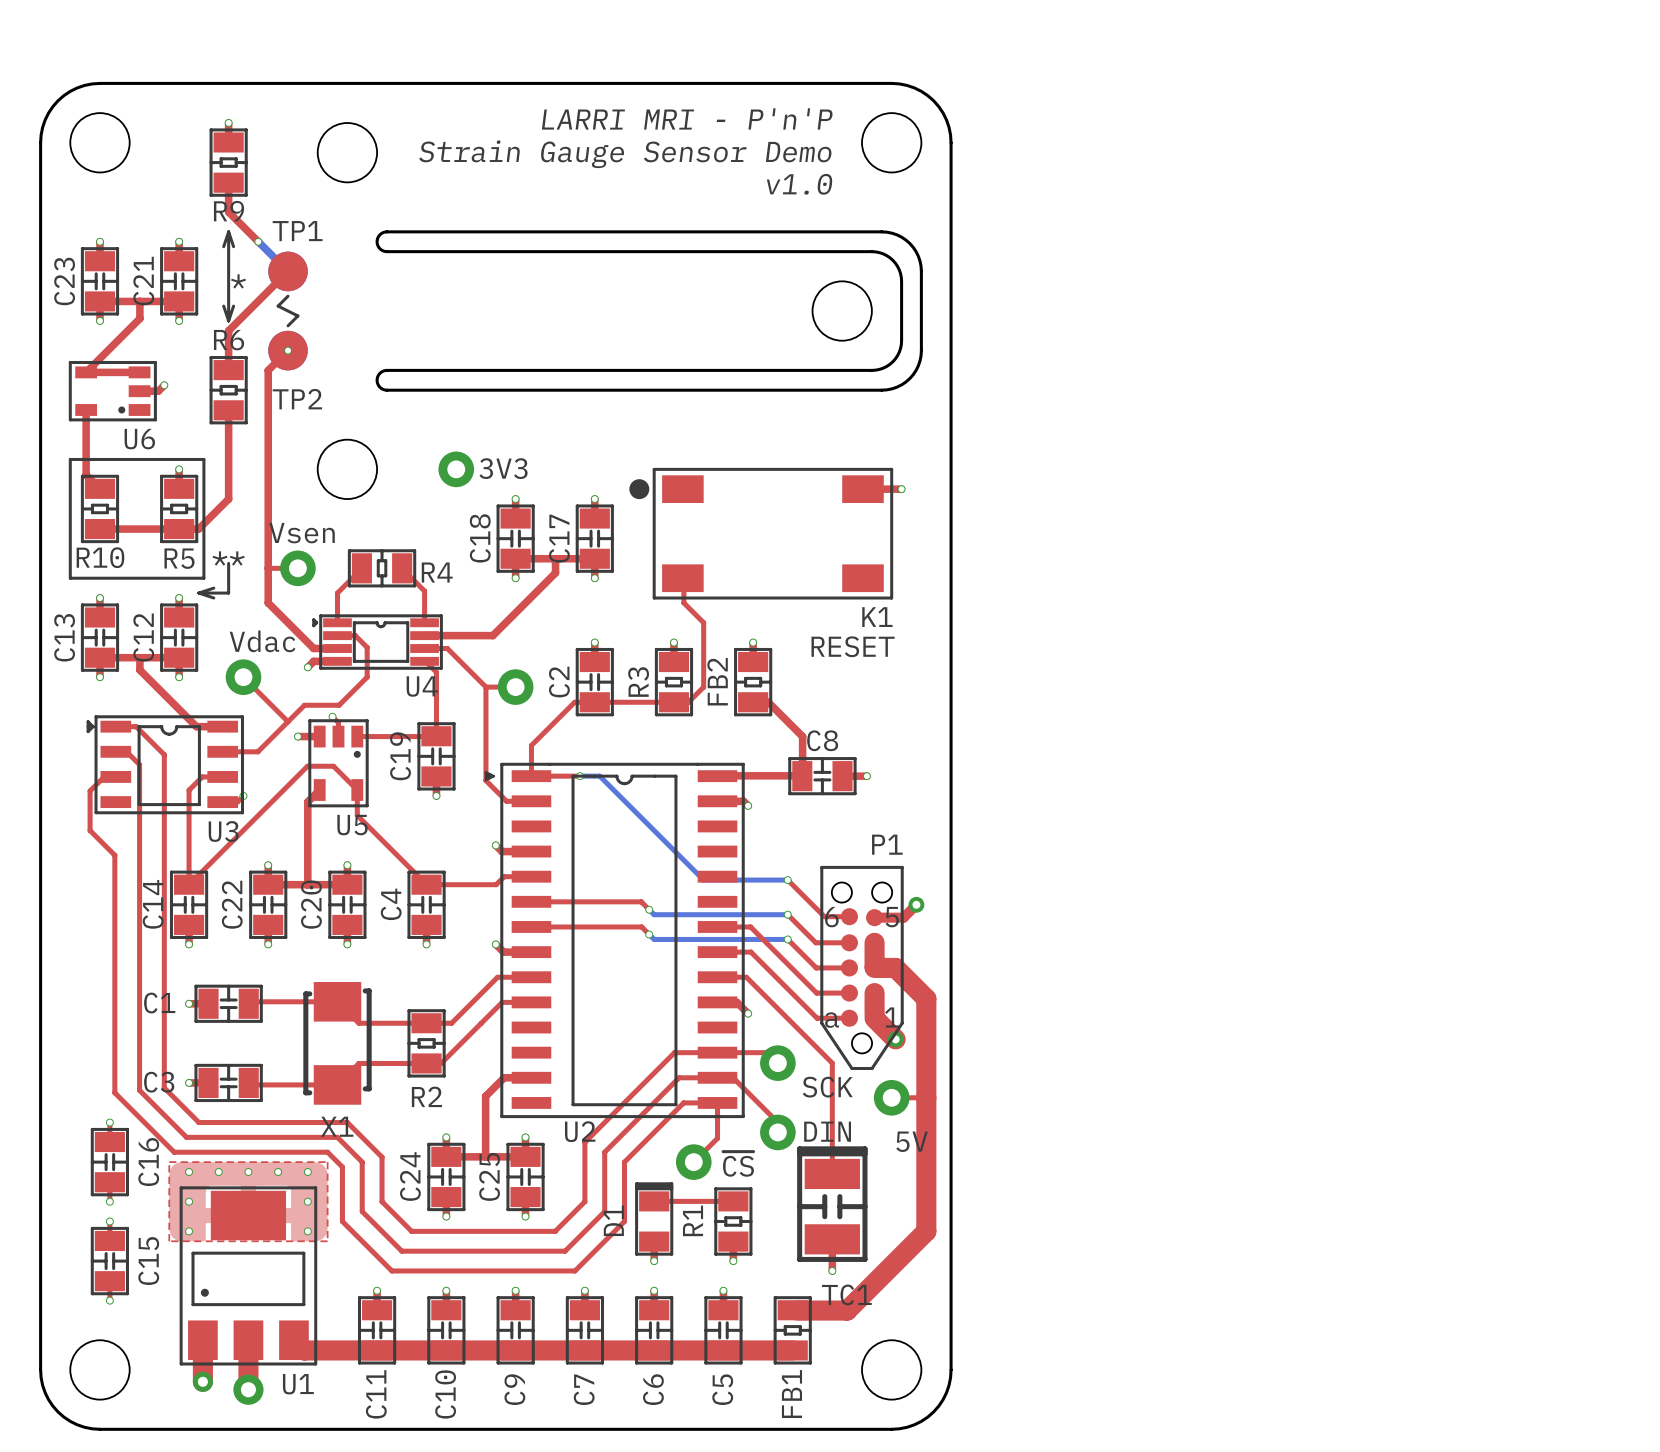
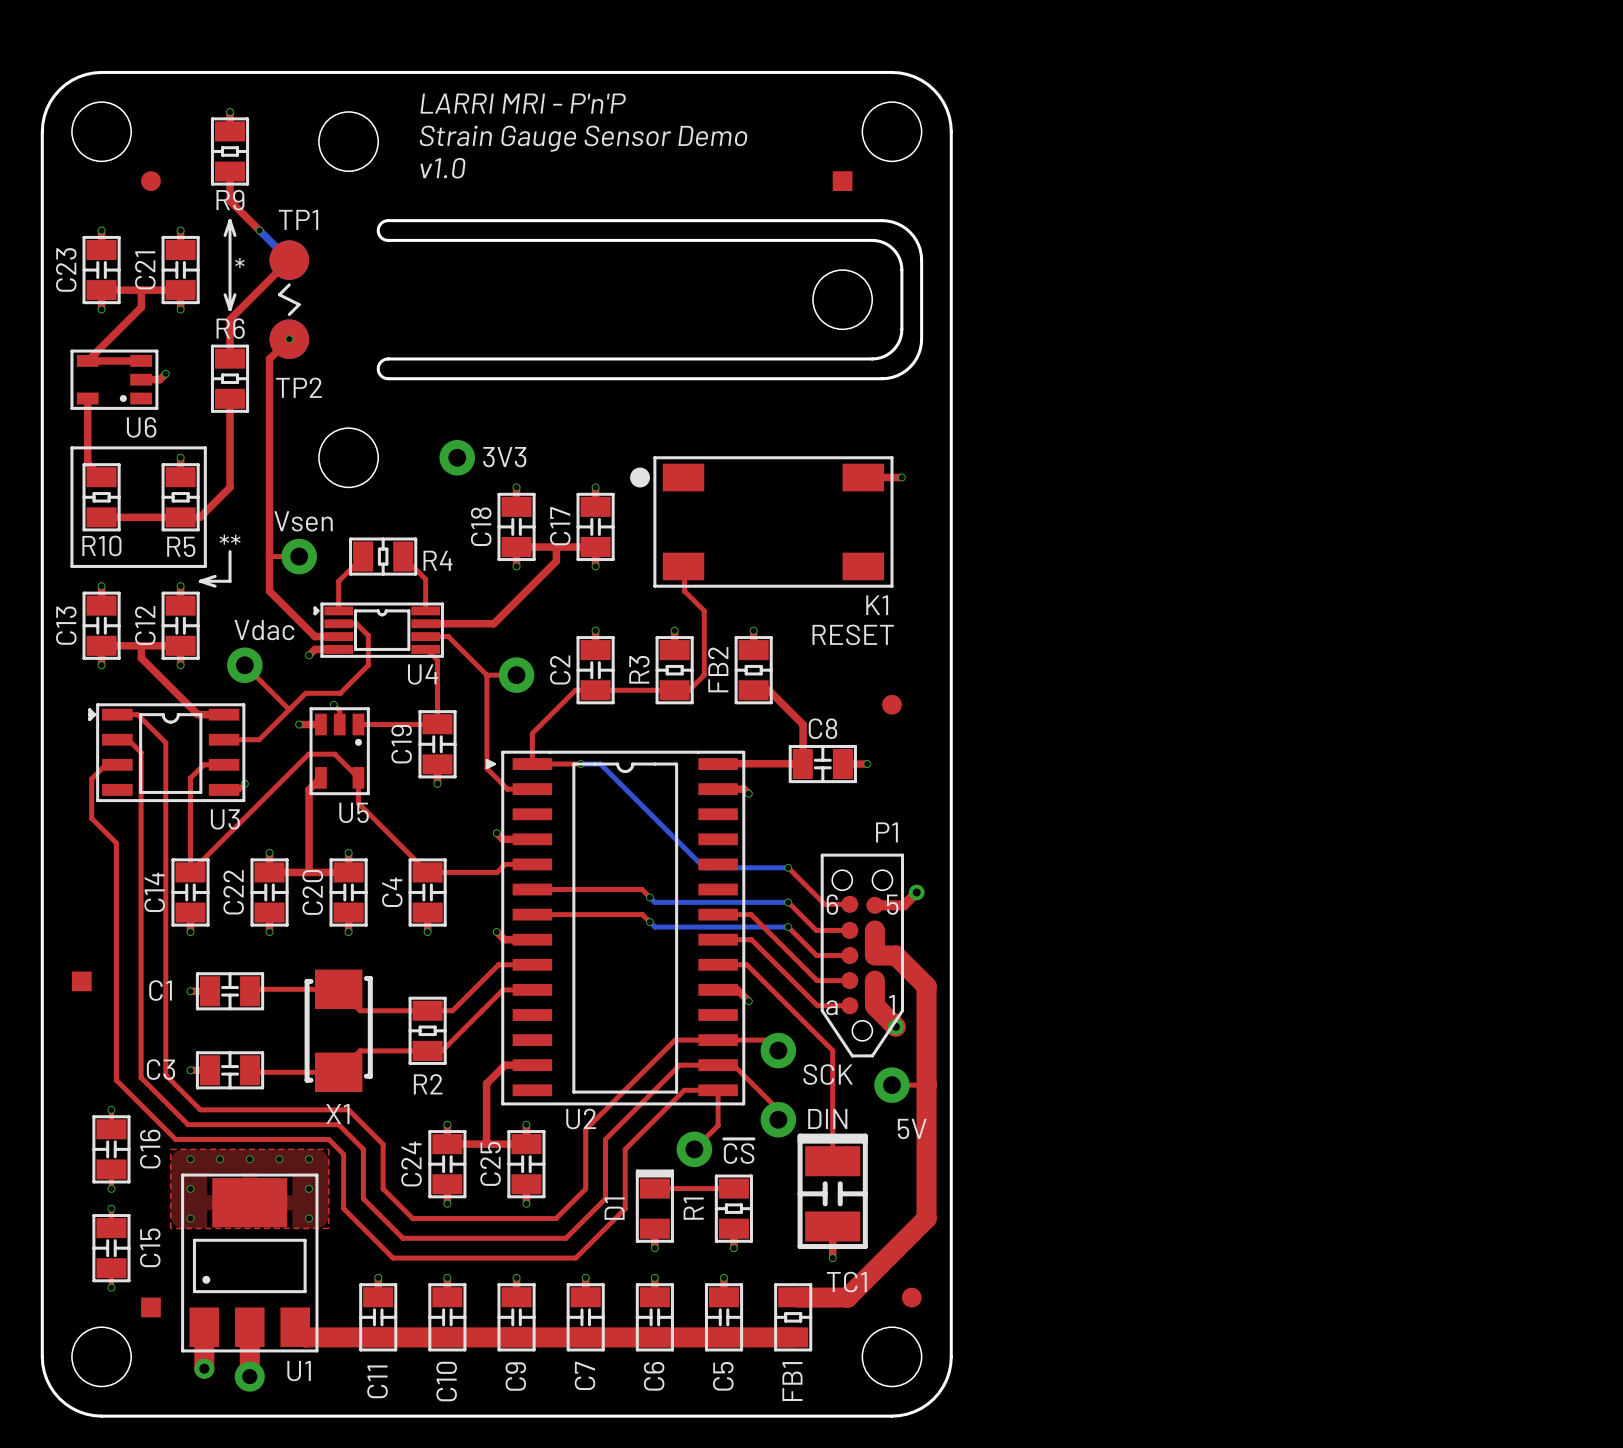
text position: LARRI MRI - P'n'P (687, 118) -> LARRI MRI - P'n'P (523, 103)
text position: Strain Gauge Sensor Demo (625, 154) -> Strain Gauge Sensor Demo (583, 138)
text position: v1.0 (799, 184) -> v1.0 (443, 168)
part: none -> (150, 181)
part: none -> (842, 181)
part: none -> (891, 704)
part: none -> (81, 981)
part: none -> (911, 1297)
part: none -> (150, 1307)

